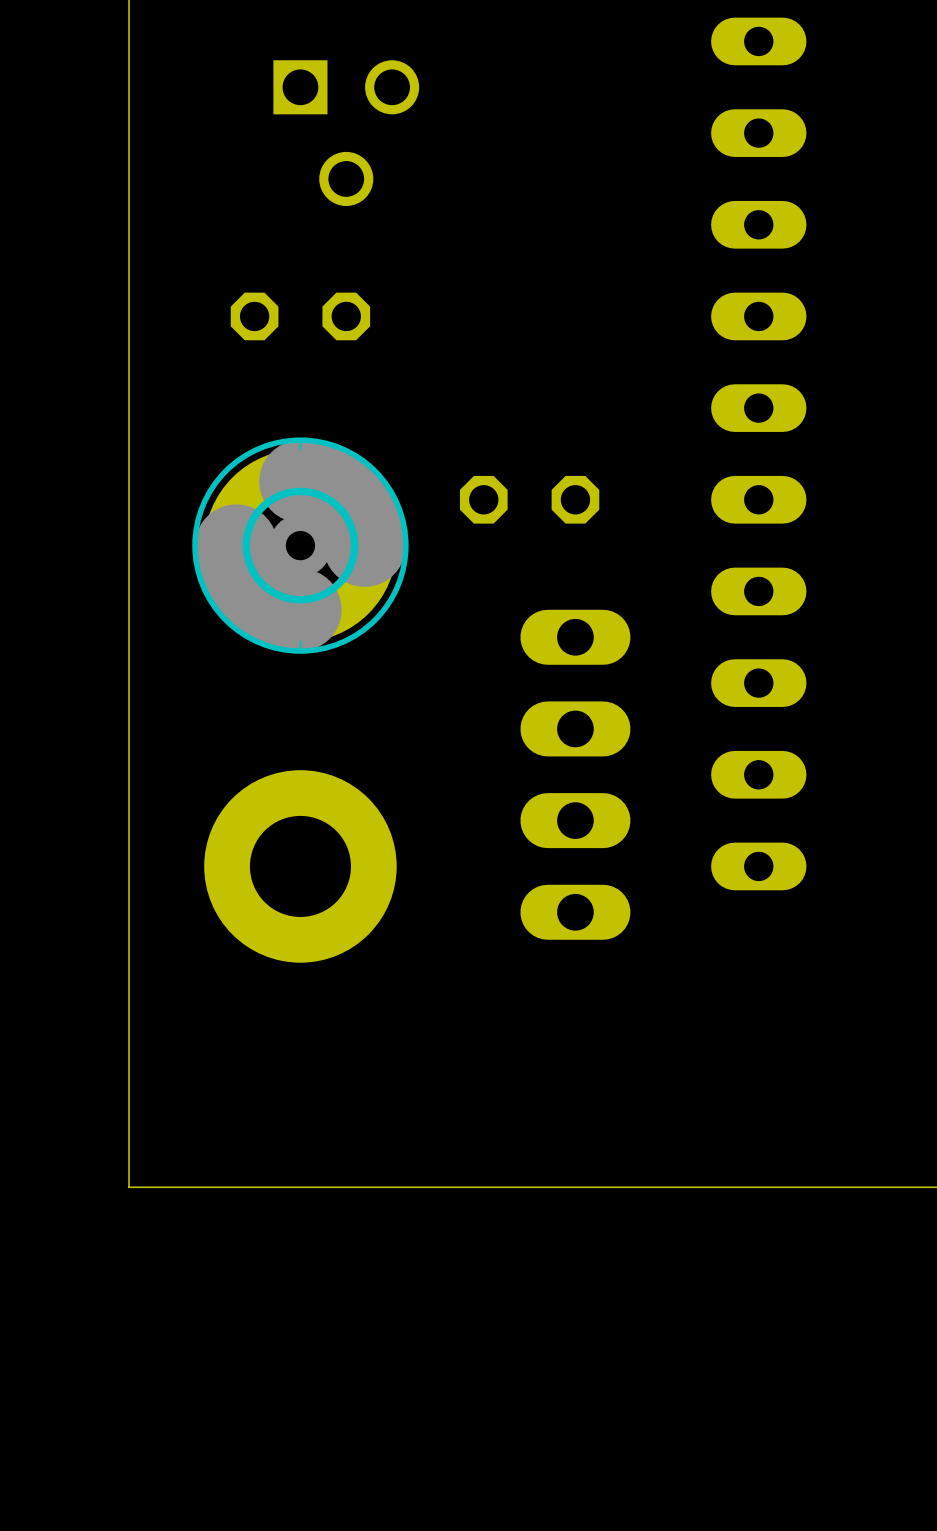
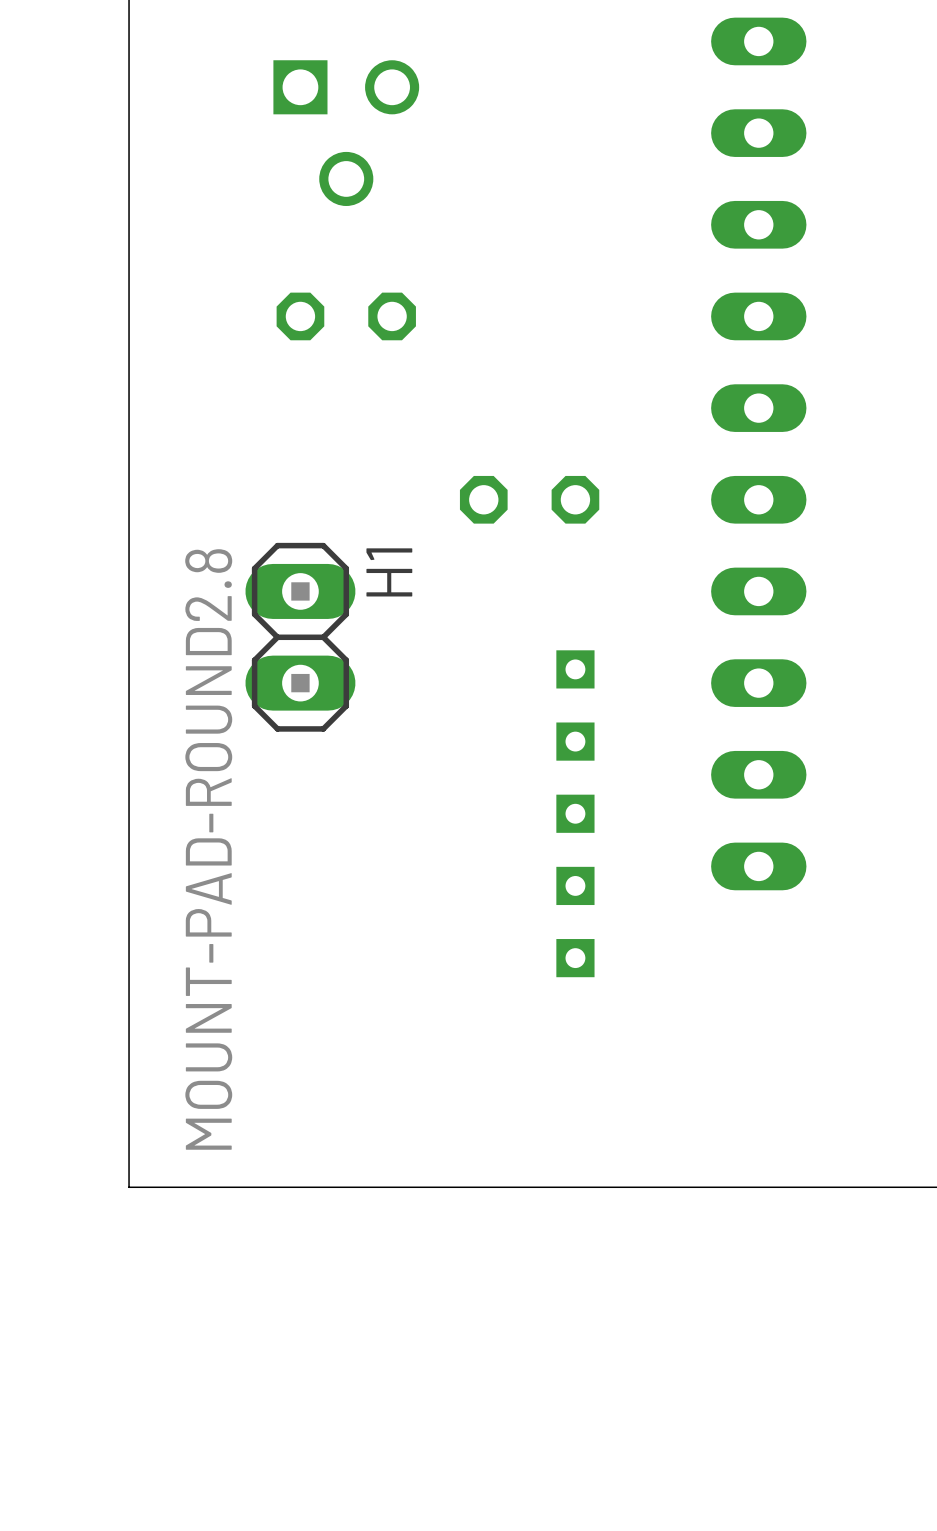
part position: (300, 316) -> (346, 316)
part: (300, 545) -> none
H1: none -> MOUNT-PAD-ROUND2.8 (300, 637)
part: (575, 774) -> none
part: none -> (575, 813)
part: (300, 866) -> none

